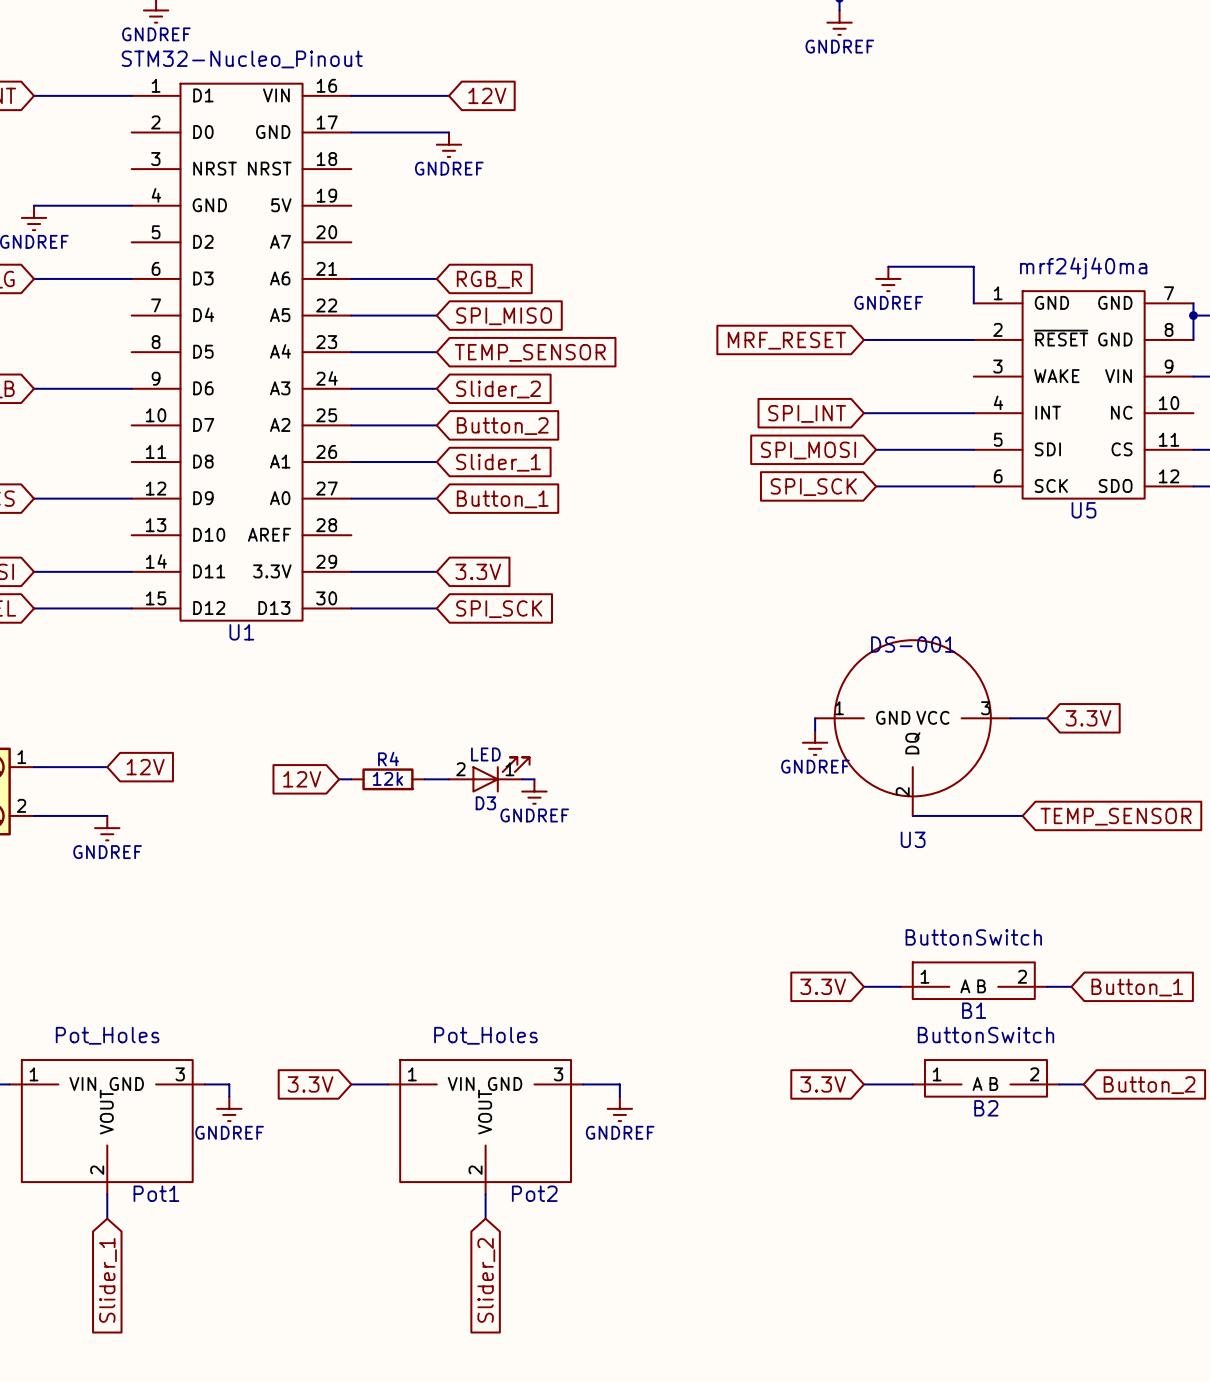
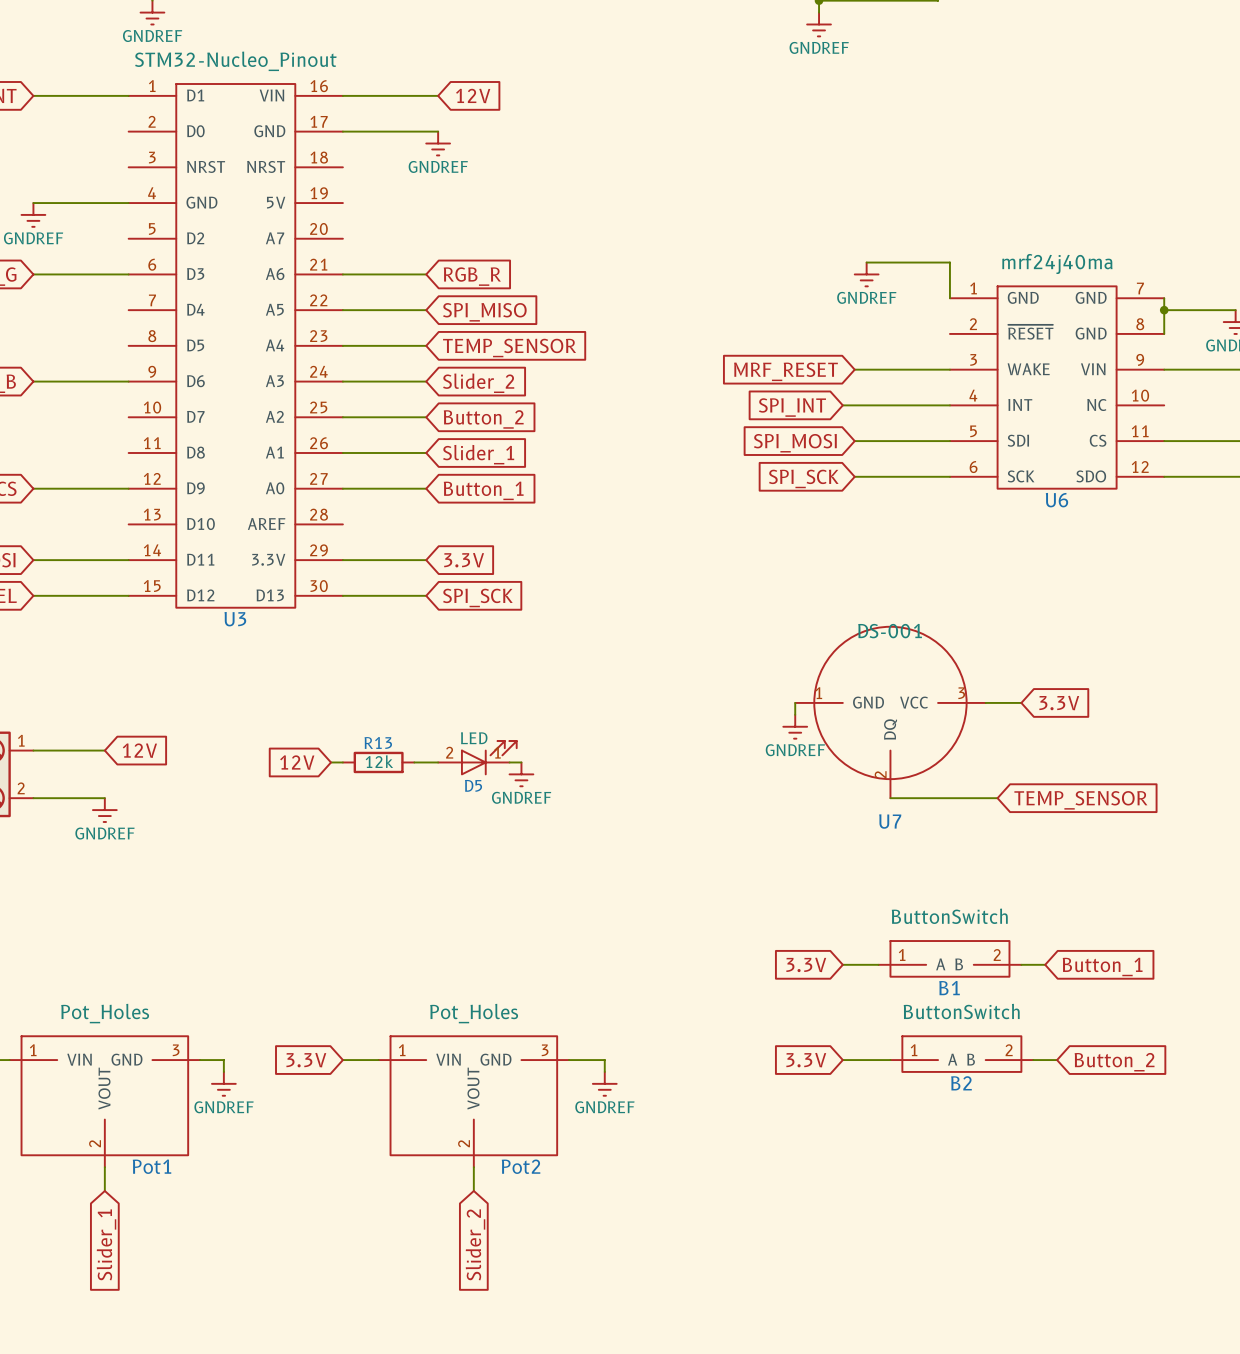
wire: (863, 339) (973, 339) -> none
global label position: MRF_RESET (786, 340) -> MRF_RESET (785, 371)
wire: none -> (854, 369) (949, 369)
U5 name: U5 (1083, 510) -> U6 (1056, 500)
U1 name: U1 (241, 632) -> U3 (235, 619)
R4 name: R4 (388, 759) -> R13 (378, 742)
D3 name: D3 (485, 803) -> D5 (473, 785)
U3 name: U3 (913, 839) -> U7 (890, 821)

